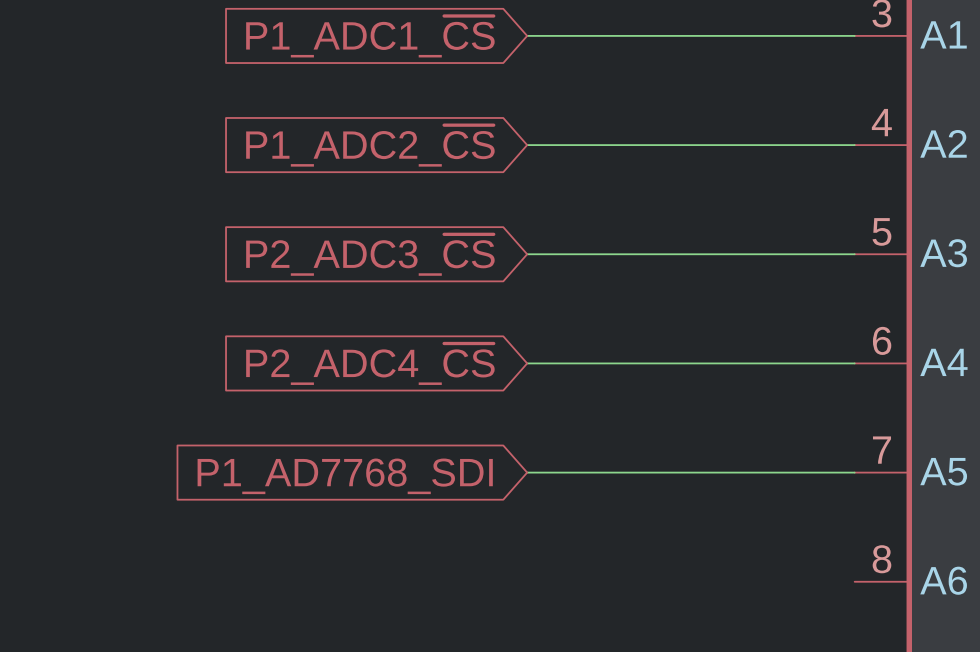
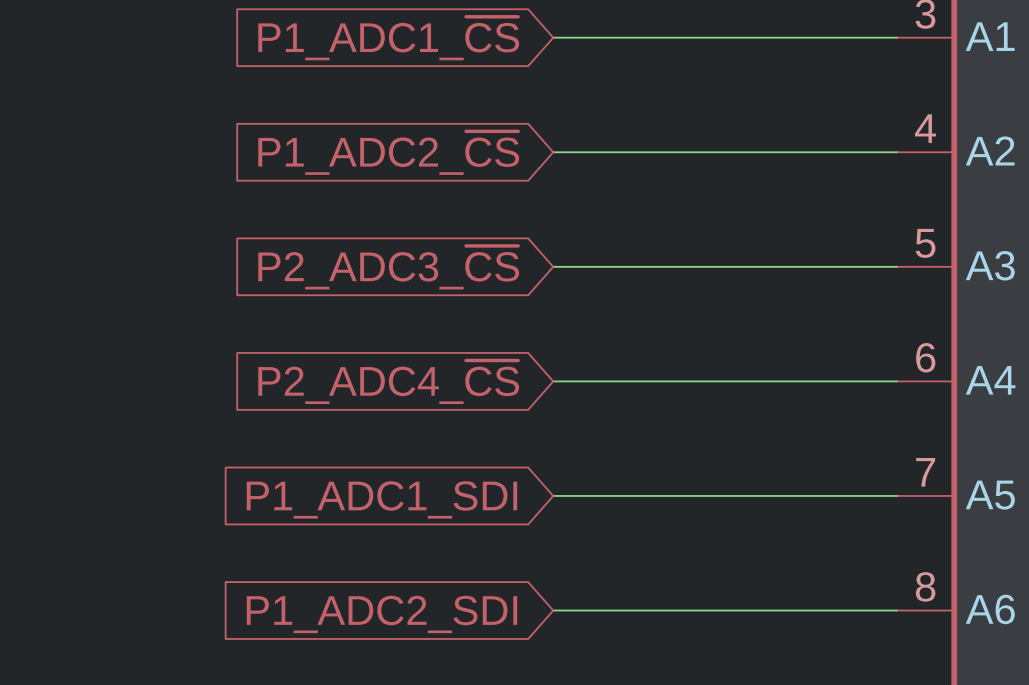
global label: P1_AD7768_SDI (345, 476) -> P1_ADC1_SDI (381, 499)
wire: none -> (553, 610) (896, 610)
global label: none -> P1_ADC2_SDI (381, 614)

